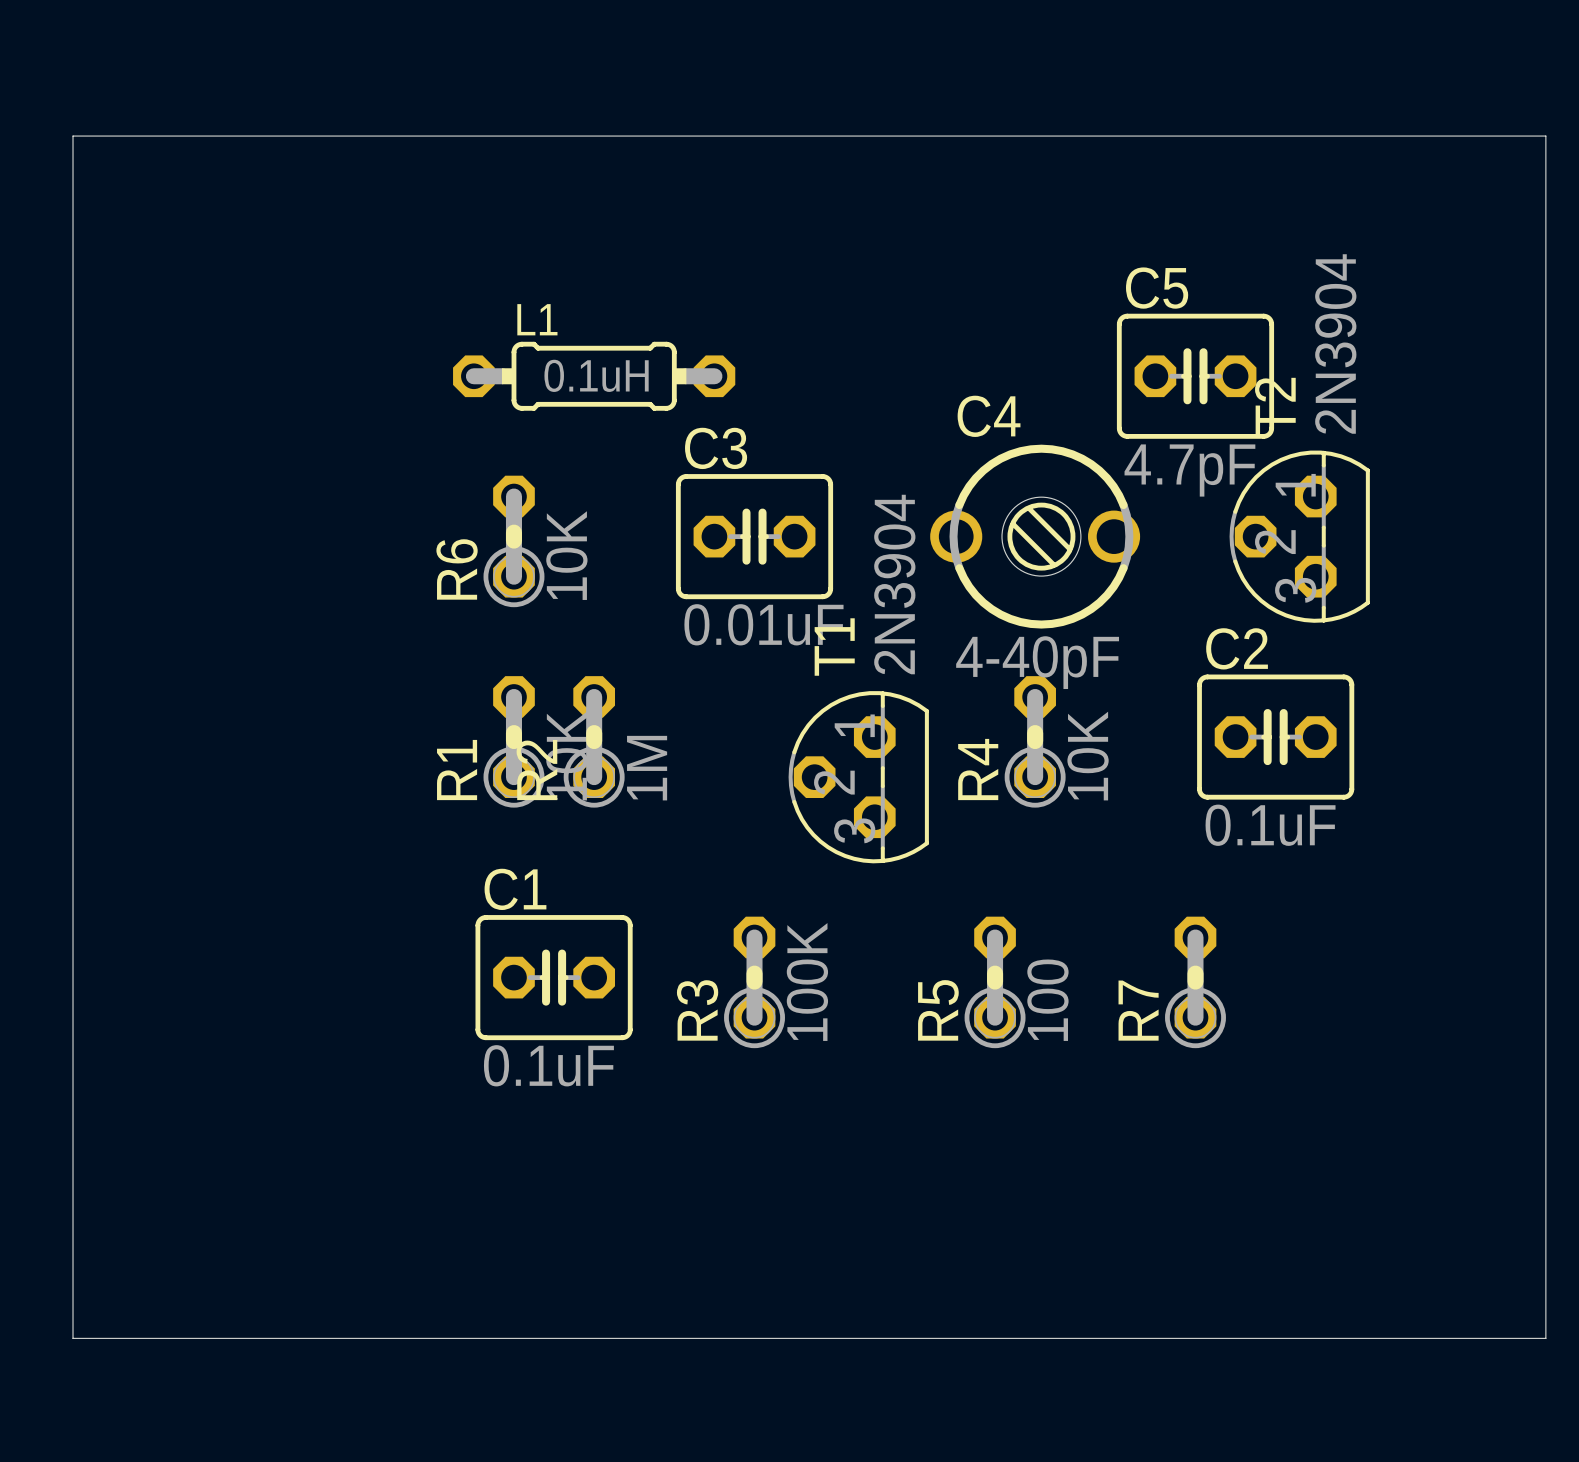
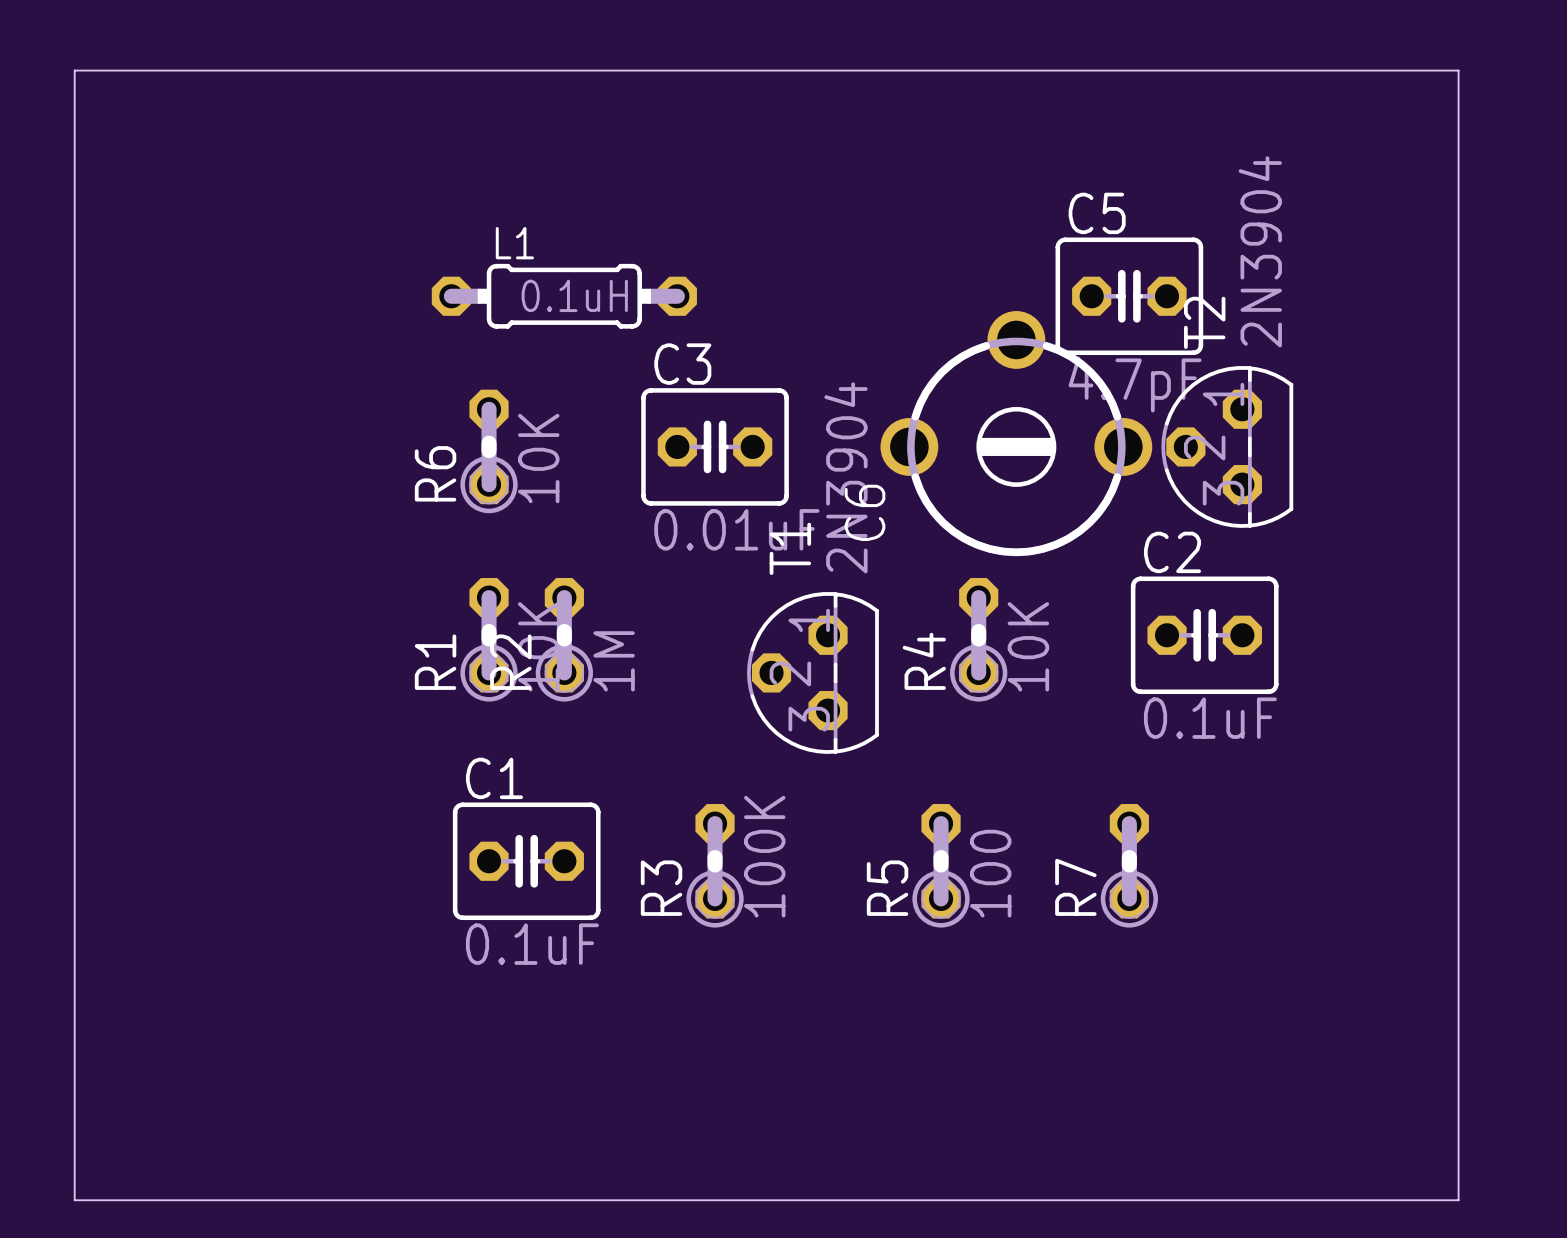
C6: none -> (1016, 433)
C4: 4-40pF (1035, 536) -> none

